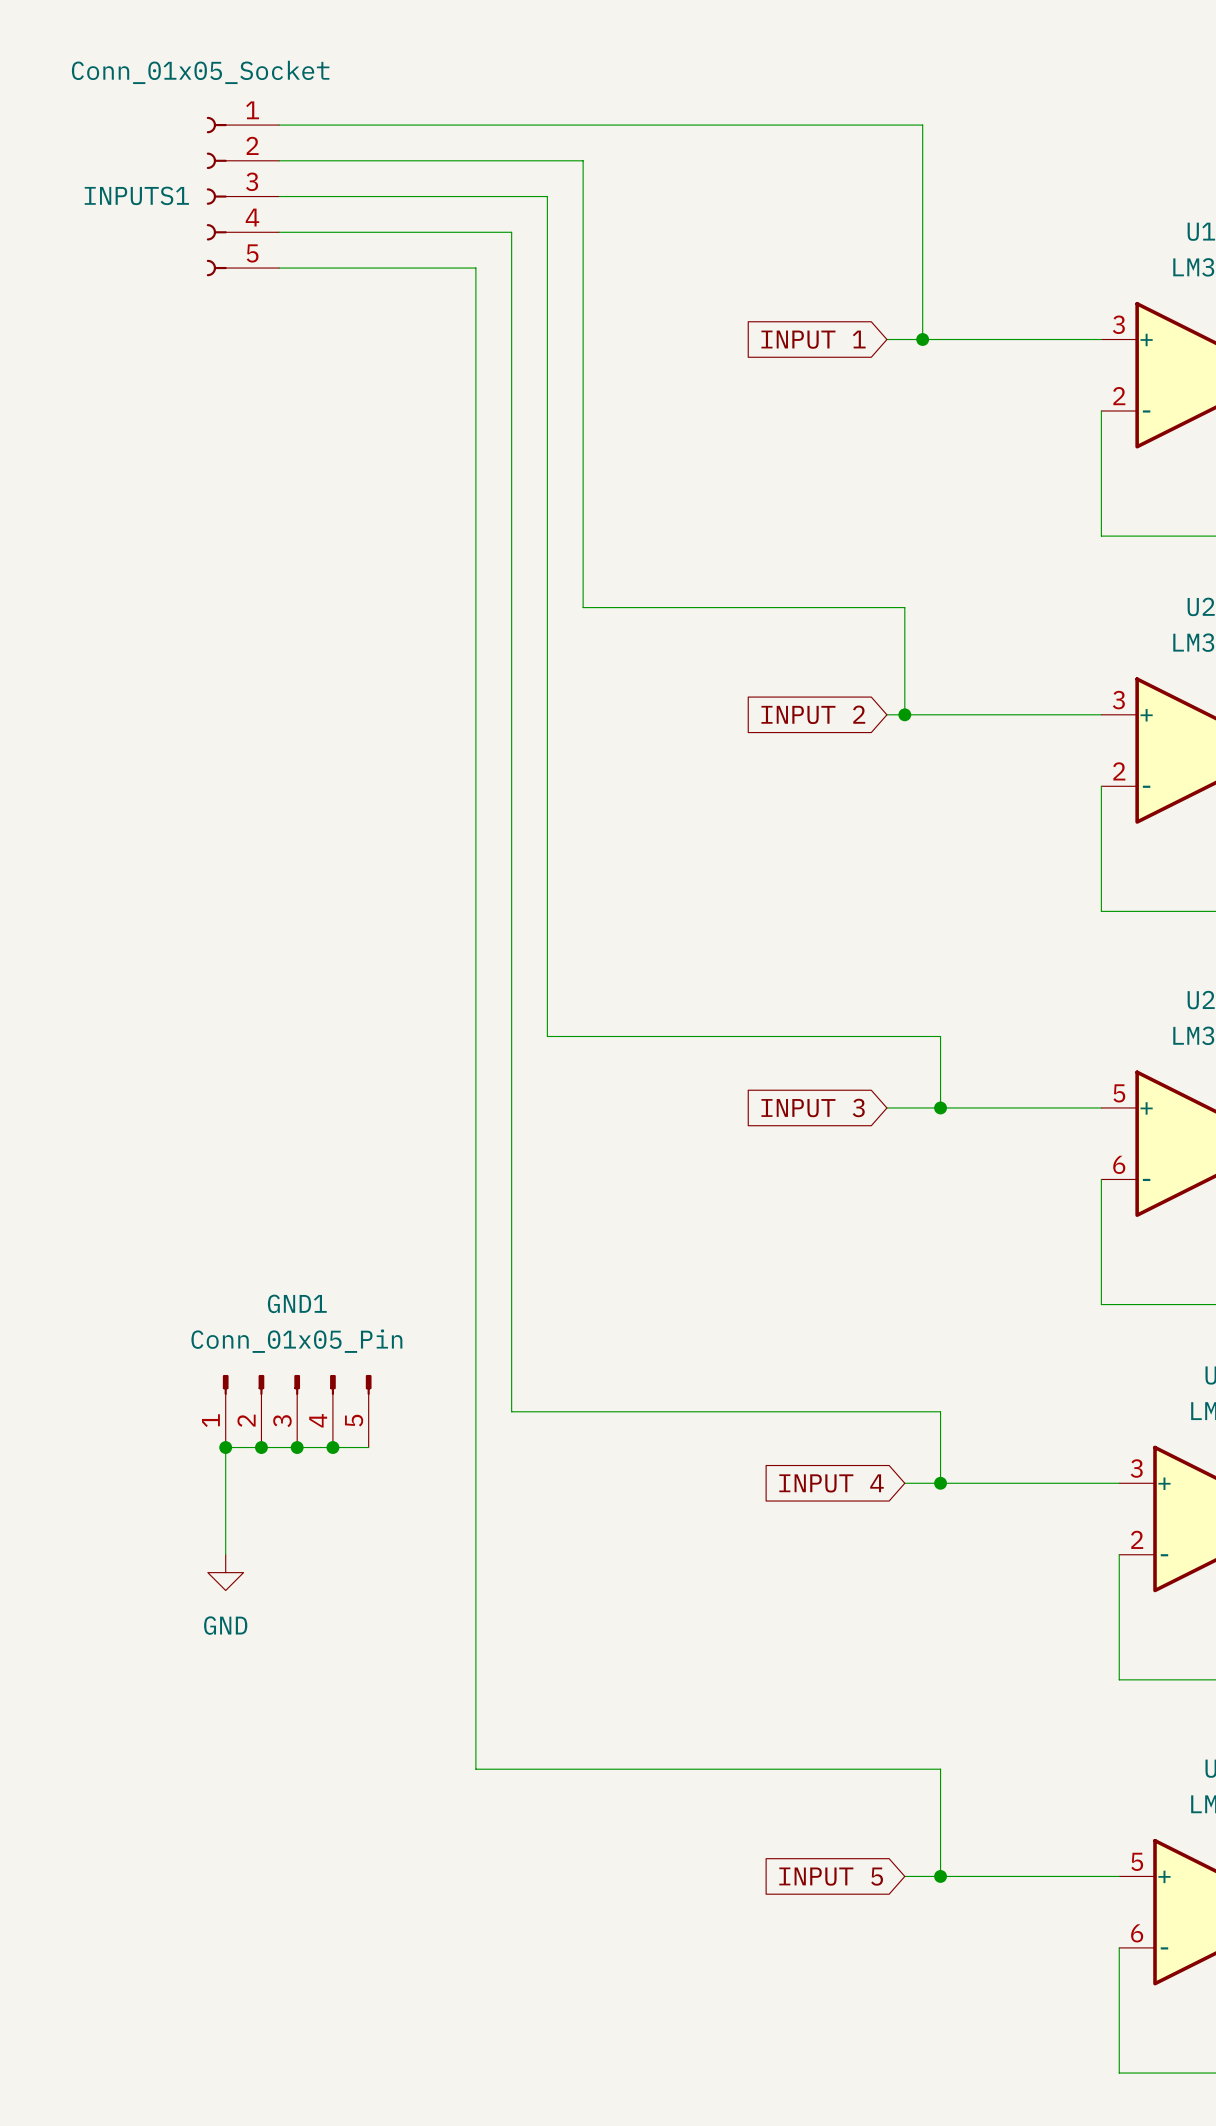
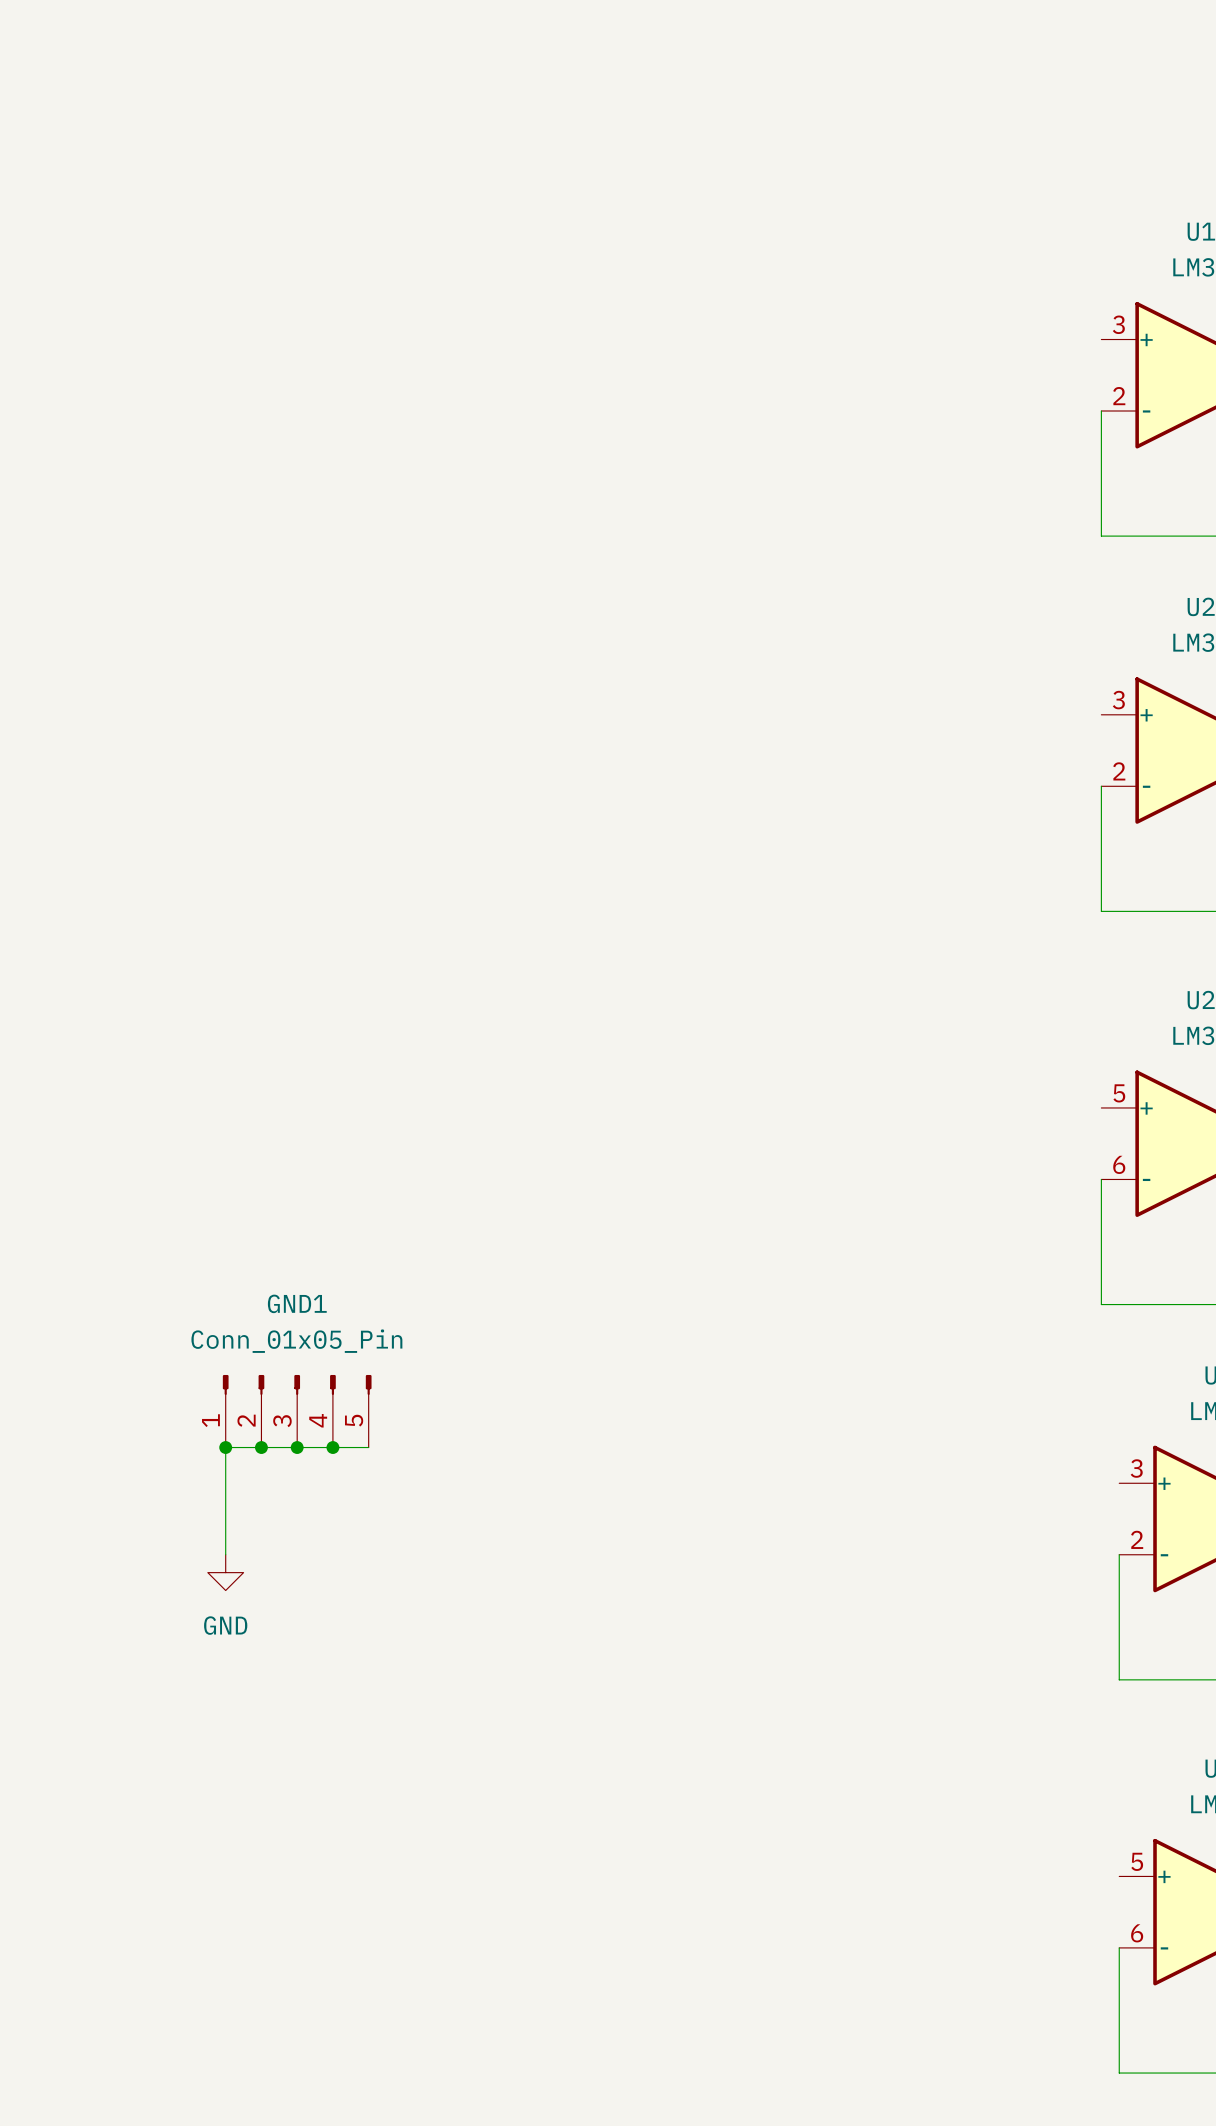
wire: (279, 125) (922, 125) (922, 339) -> none
wire: (279, 160) (583, 160) (583, 607) (904, 607) (904, 714) -> none
INPUTS1: Conn_01x05_Socket (243, 196) -> none
wire: (279, 196) (547, 196) (547, 1036) (940, 1036) (940, 1107) -> none
wire: (279, 232) (511, 232) (511, 1411) (940, 1411) (940, 1483) -> none
wire: (279, 268) (475, 268) (475, 1769) (940, 1769) (940, 1876) -> none
global label: INPUT 1 (813, 339) -> none
wire: (886, 339) (1101, 339) -> none
junction: (922, 339) -> none
global label: INPUT 2 (813, 714) -> none
wire: (886, 714) (1101, 714) -> none
junction: (904, 714) -> none
global label: INPUT 3 (813, 1107) -> none
wire: (886, 1107) (1101, 1107) -> none
junction: (940, 1107) -> none
global label: INPUT 4 (831, 1483) -> none
wire: (904, 1483) (1119, 1483) -> none
junction: (940, 1483) -> none
global label: INPUT 5 (831, 1876) -> none
wire: (904, 1876) (1119, 1876) -> none
junction: (940, 1876) -> none

